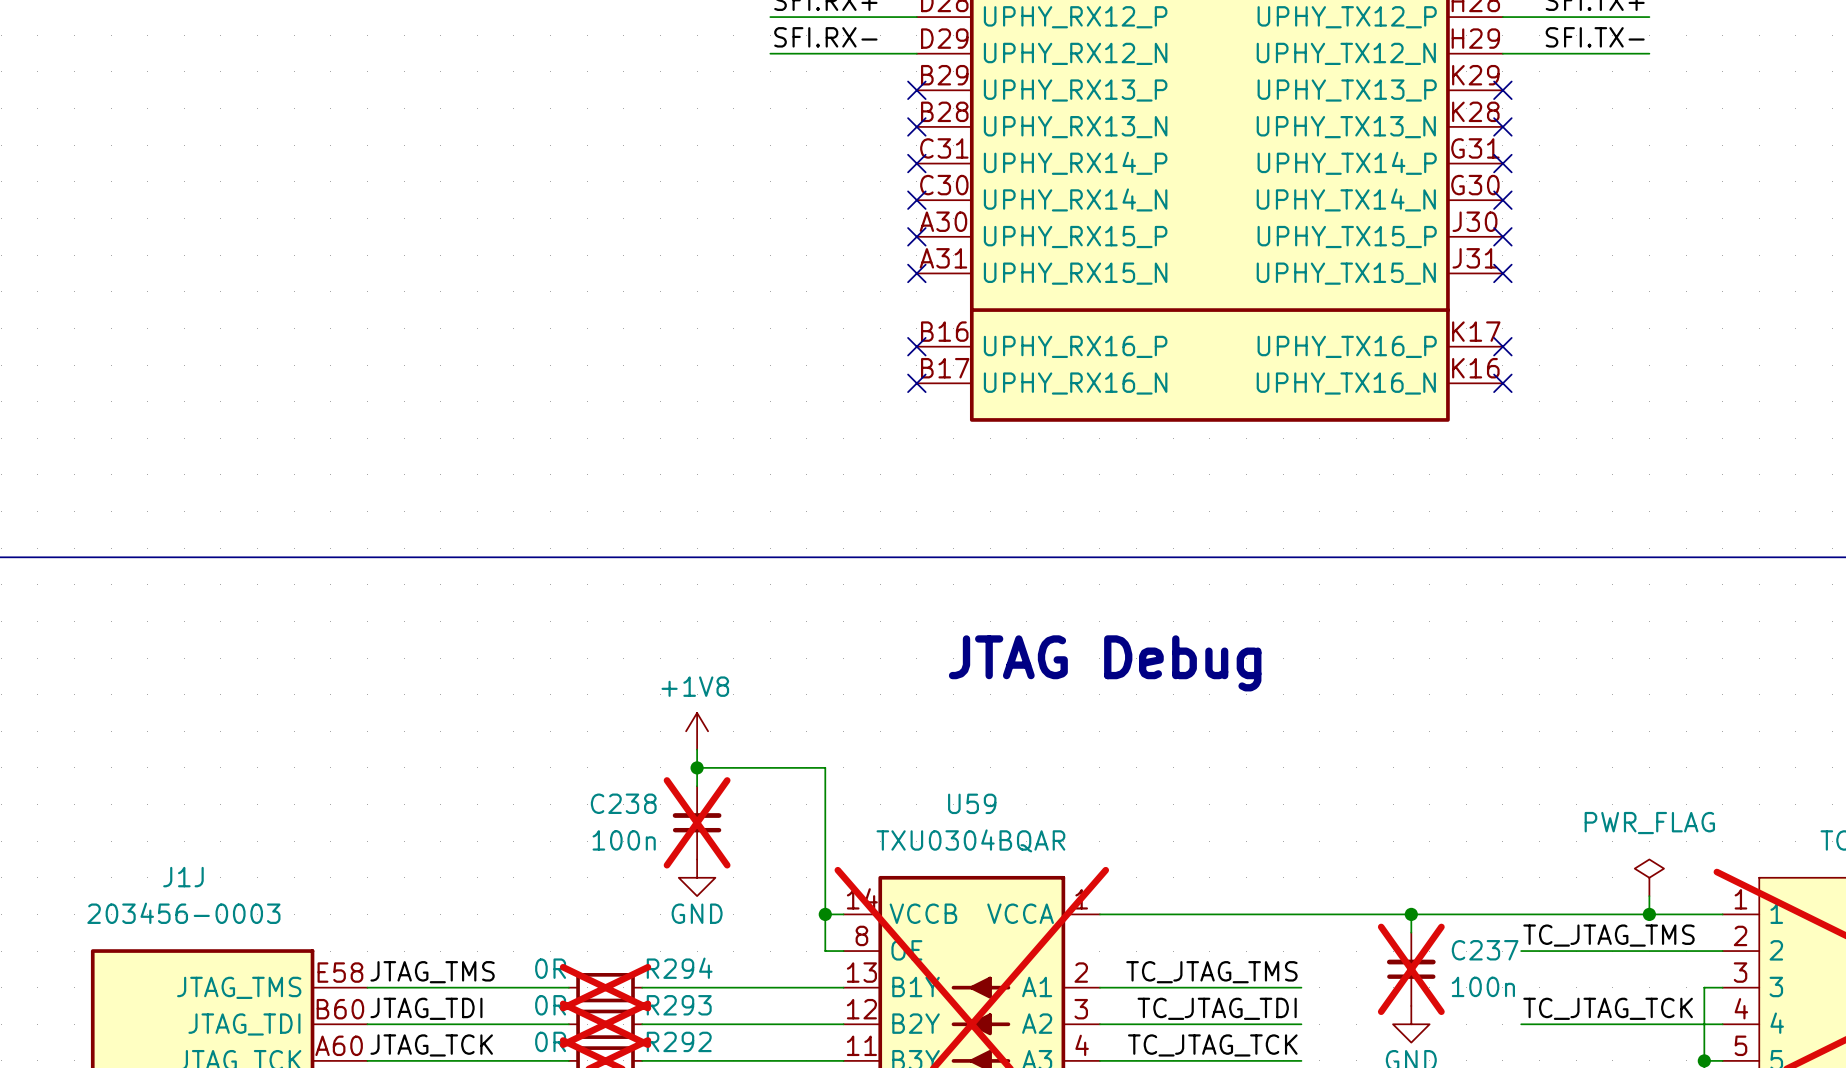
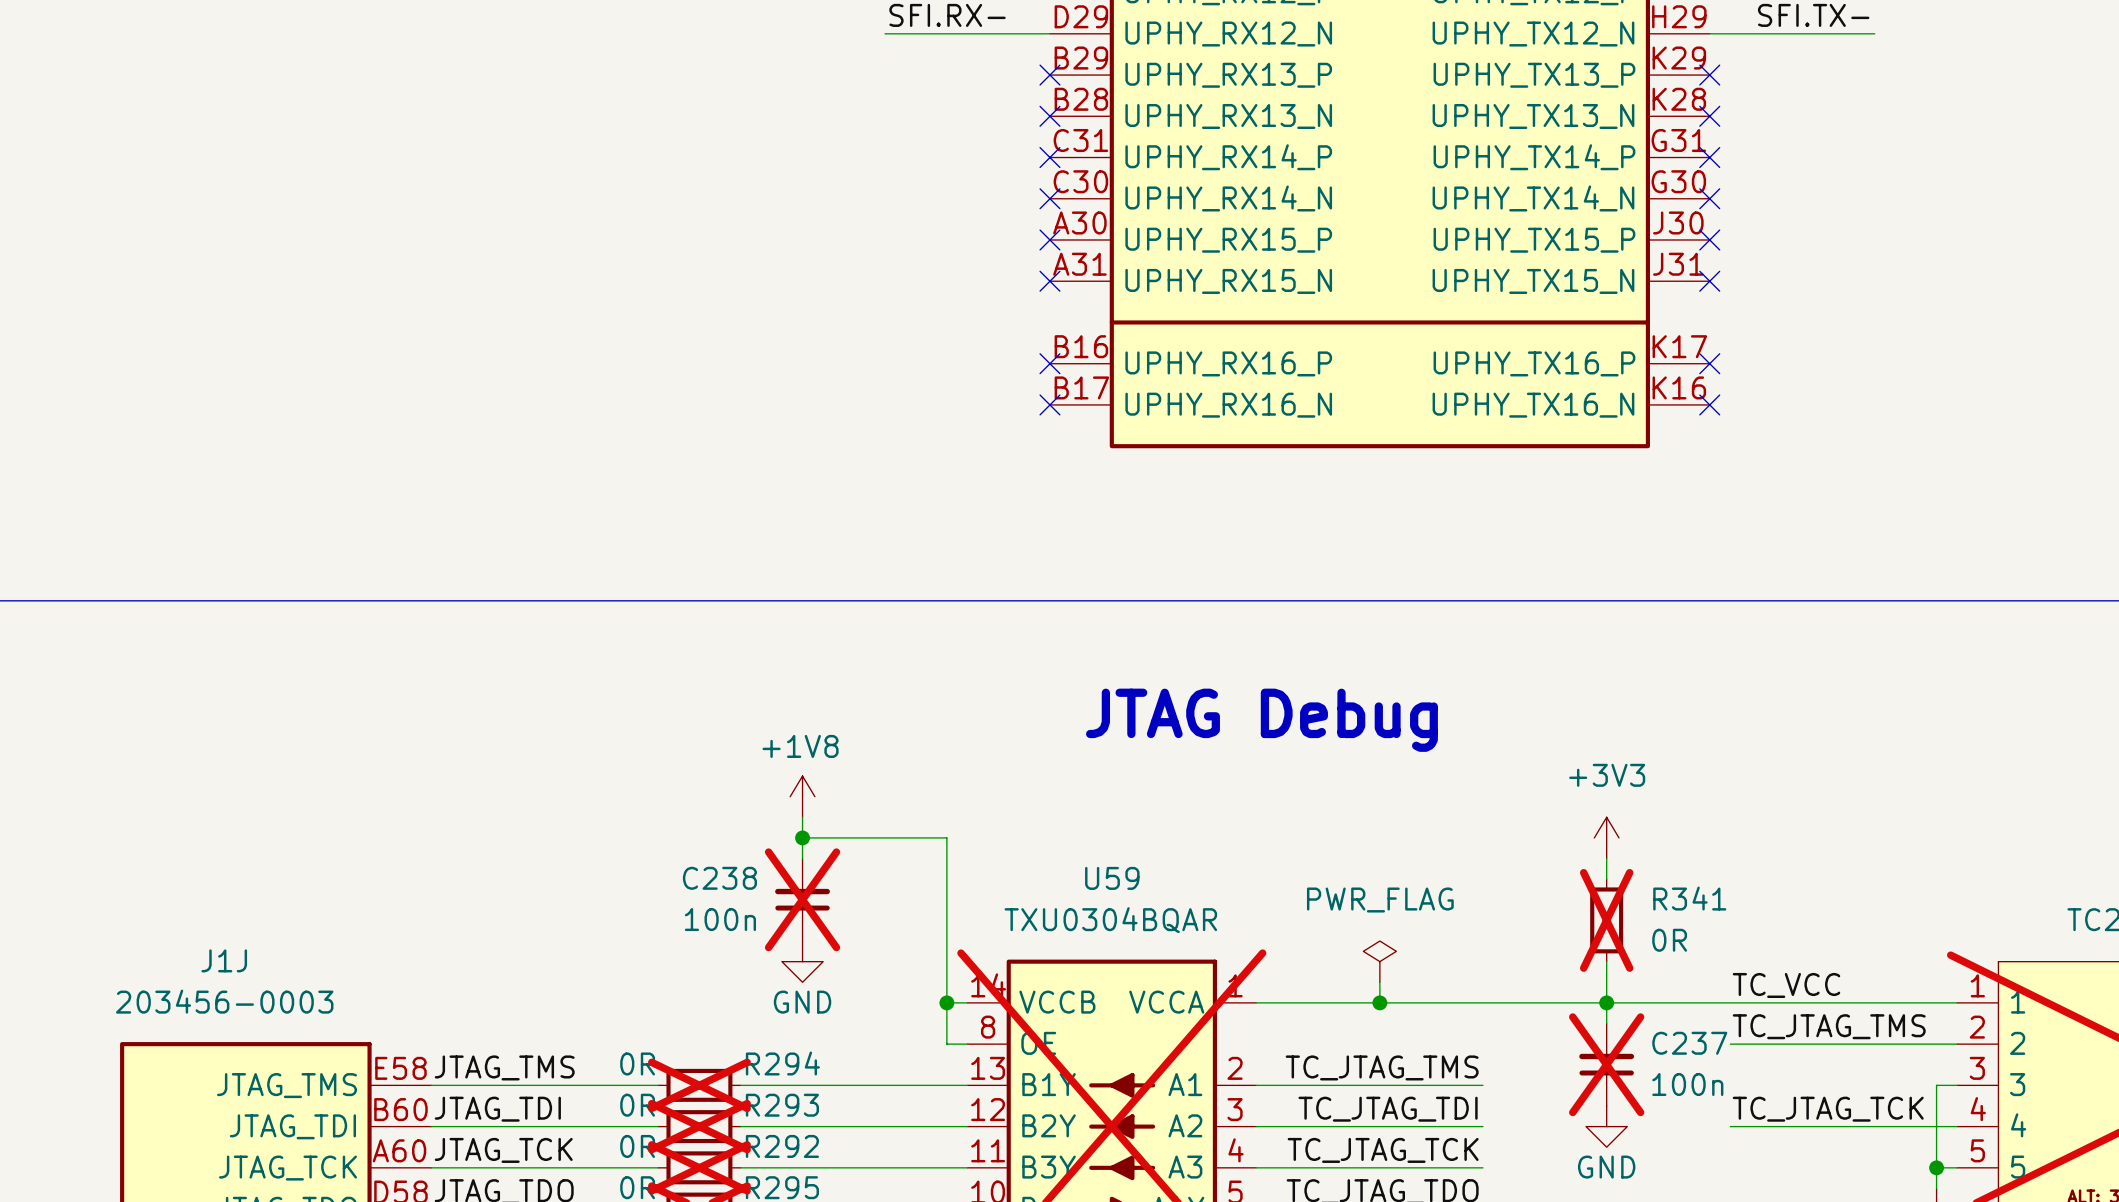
power symbol: none -> +3V3 (1606, 837)
R341: none -> (1606, 920)
power symbol: none -> PWR_FLAG (1379, 961)
wire: none -> (1606, 961) (1606, 1002)
power symbol: PWR_FLAG (1649, 877) -> none
wire: none -> (1379, 982) (1379, 1002)
wire: (1649, 896) (1649, 914) -> (1606, 858) (1606, 879)
label: none -> TC_VCC (1786, 985)
junction: none -> (1379, 1002)
junction: (1649, 914) -> none

